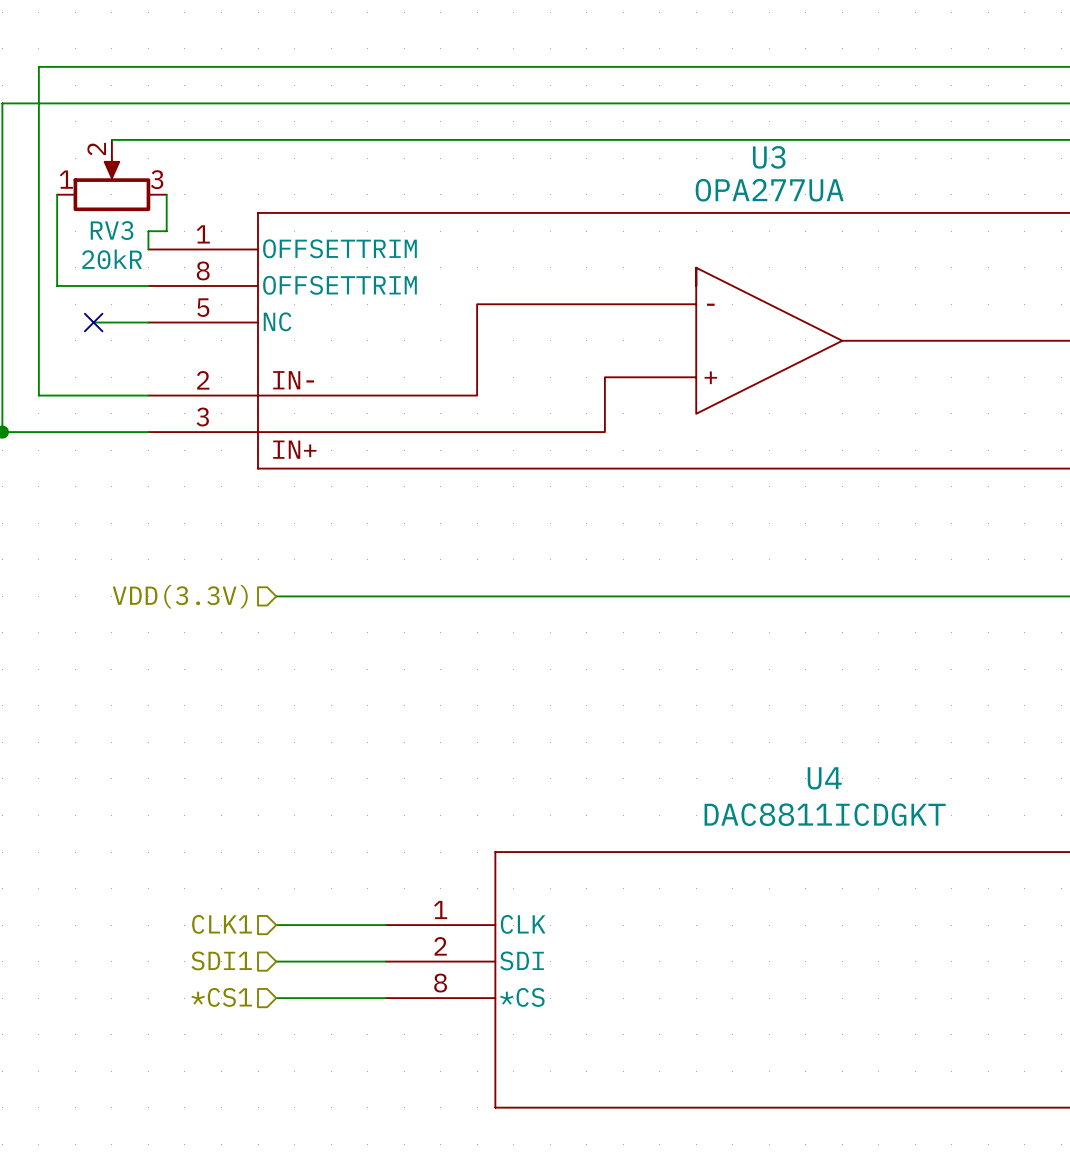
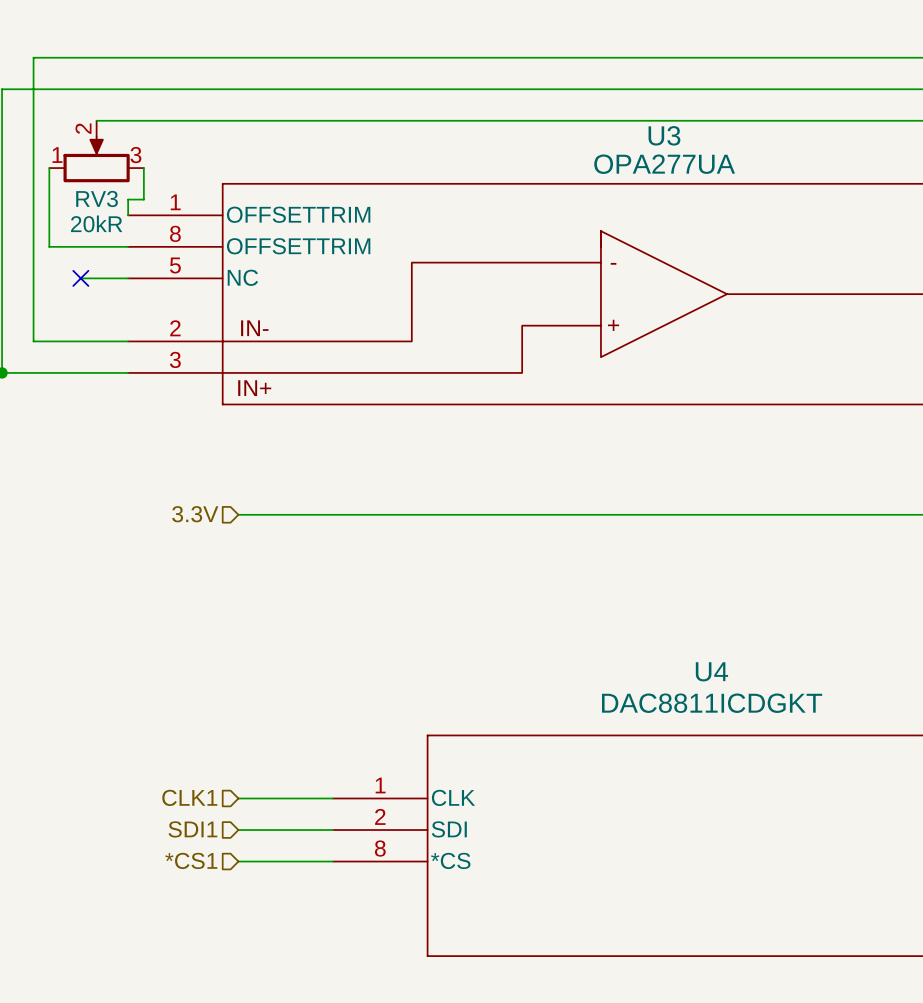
hierarchical label: VDD(3.3V) (180, 596) -> 3.3V (195, 514)

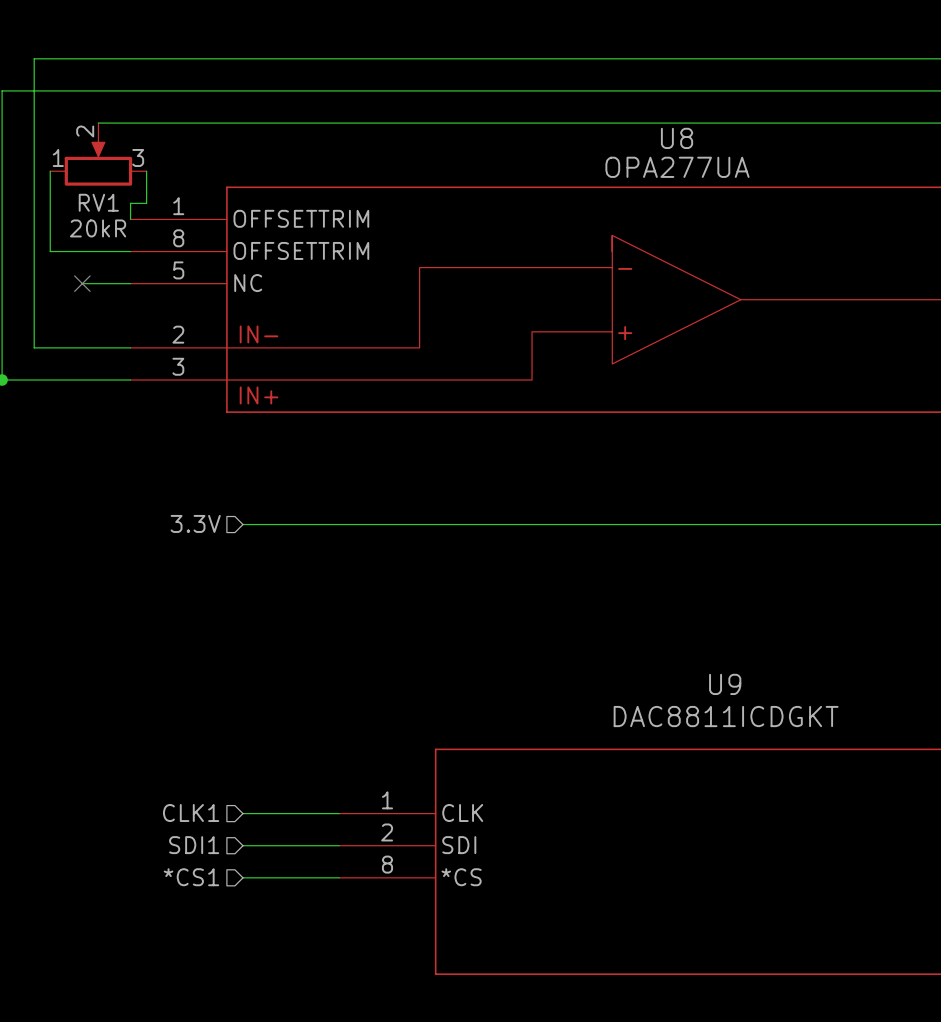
U3 name: U3 (664, 135) -> U8 (677, 138)
RV3 name: RV3 (97, 198) -> RV1 (98, 202)
U4 name: U4 (711, 671) -> U9 (725, 684)

